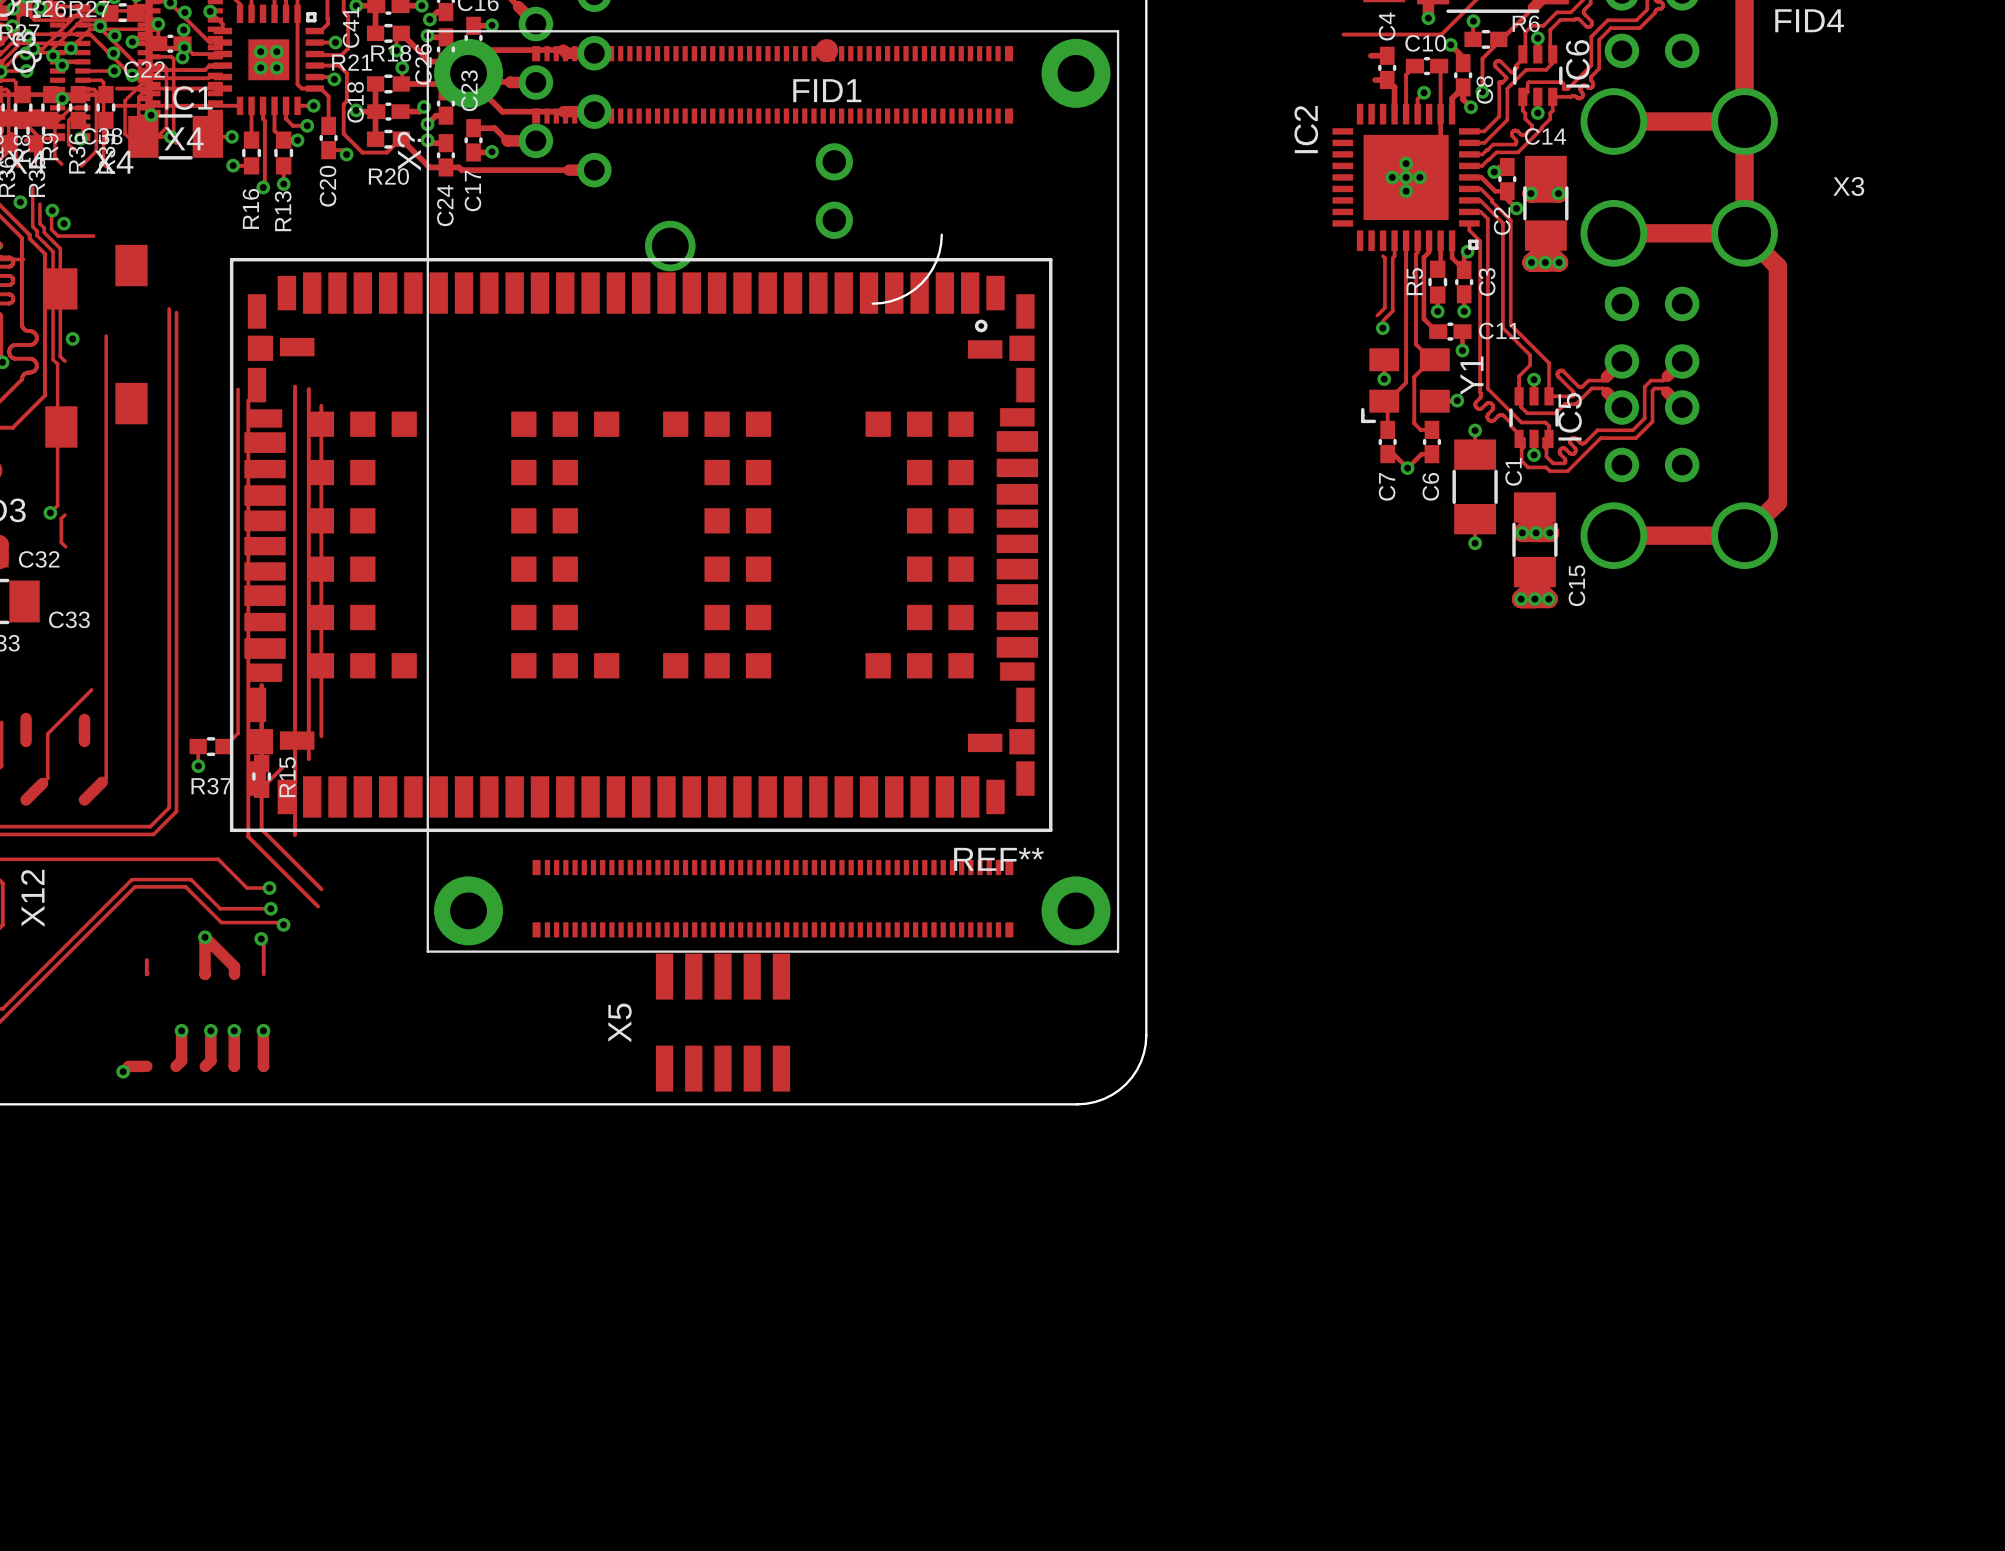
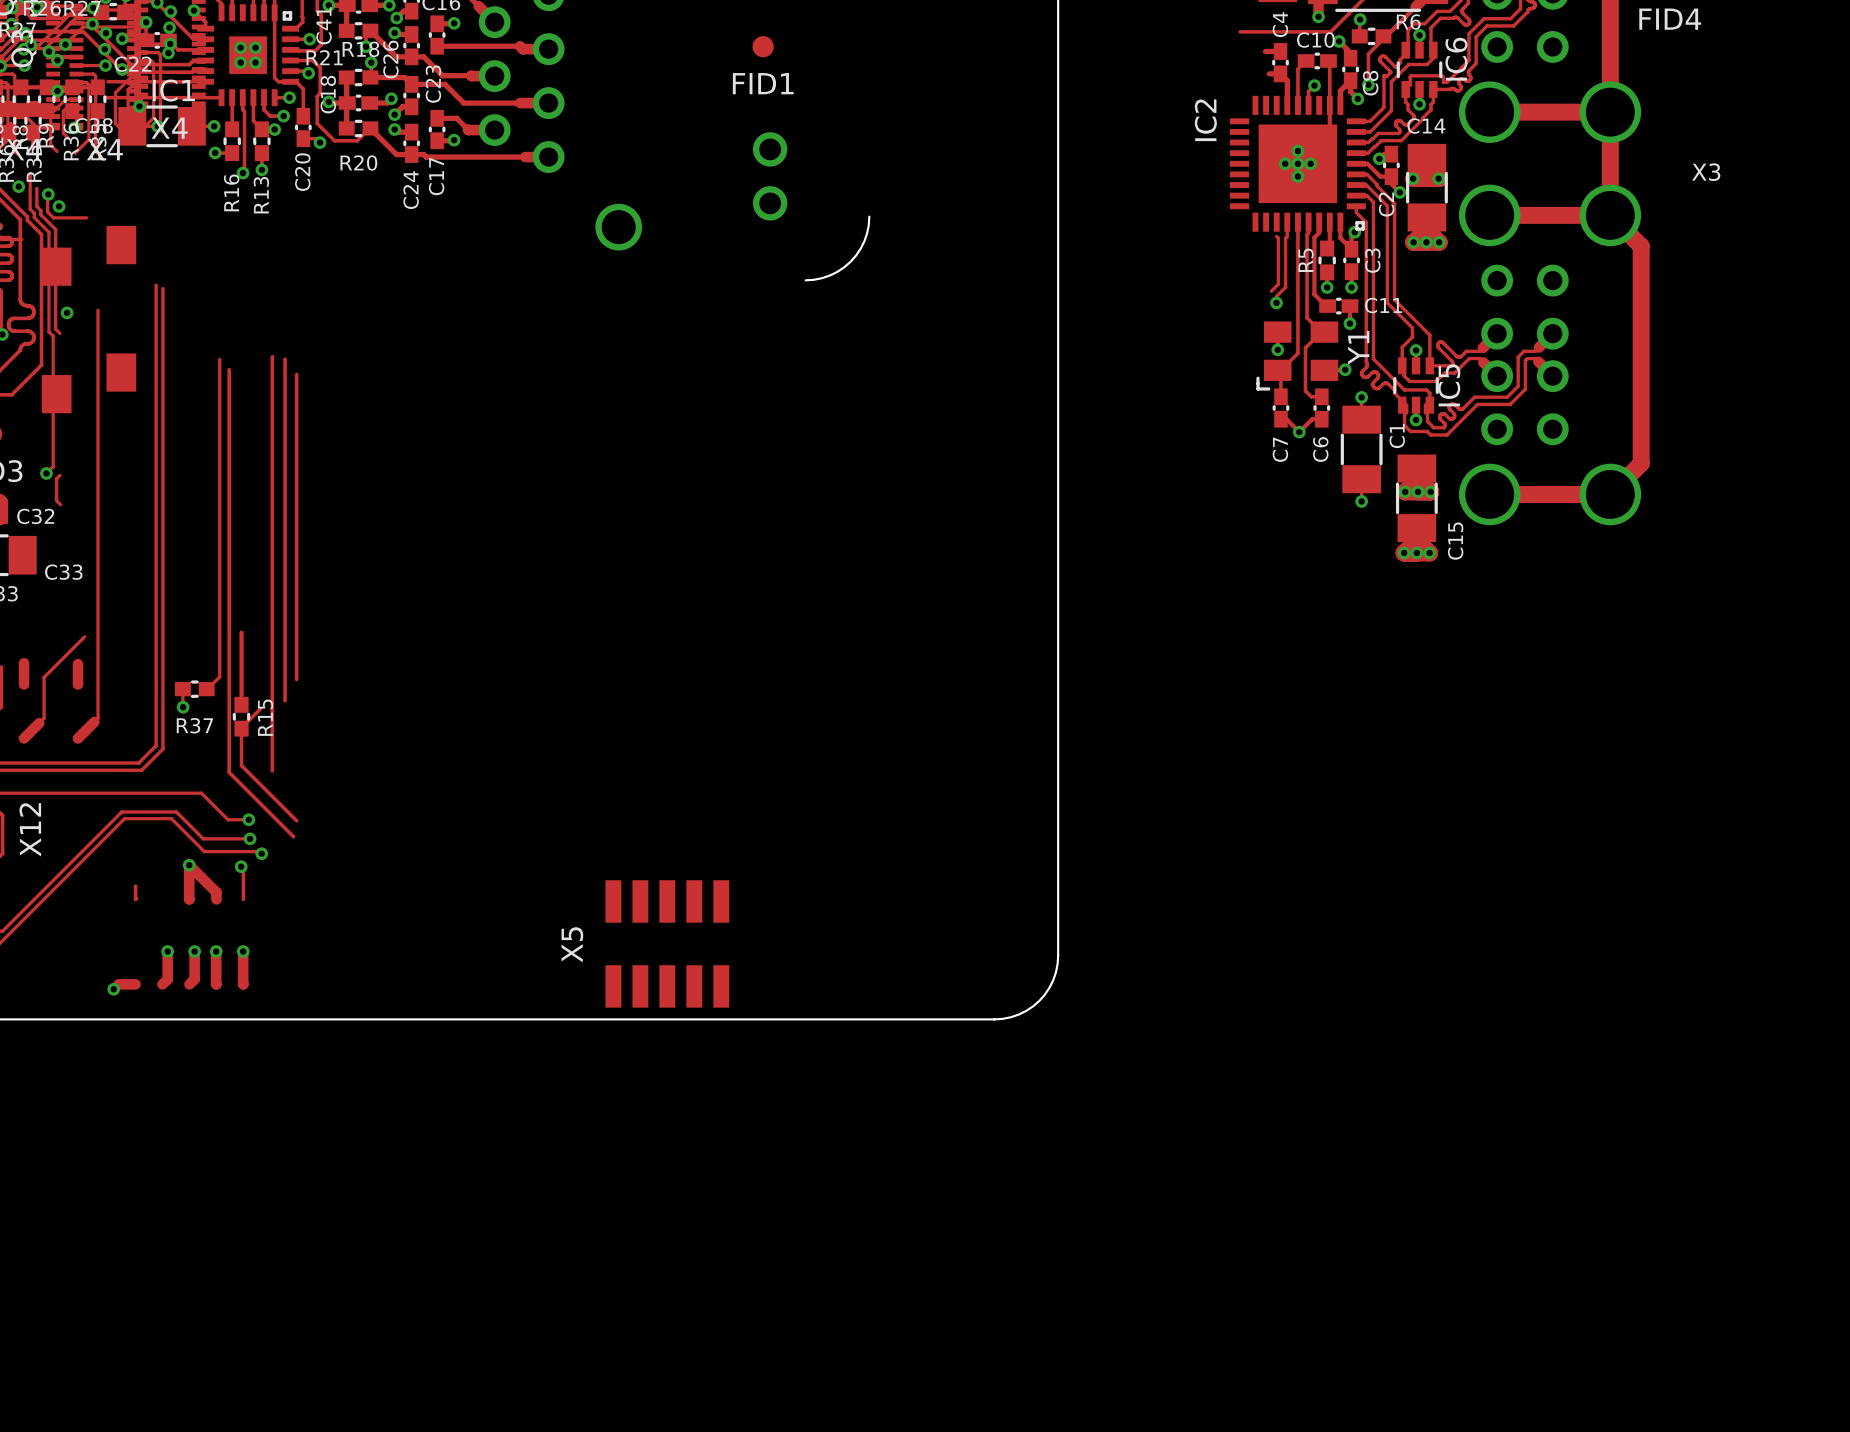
X?: (772, 491) -> none
REF**: (641, 545) -> none

